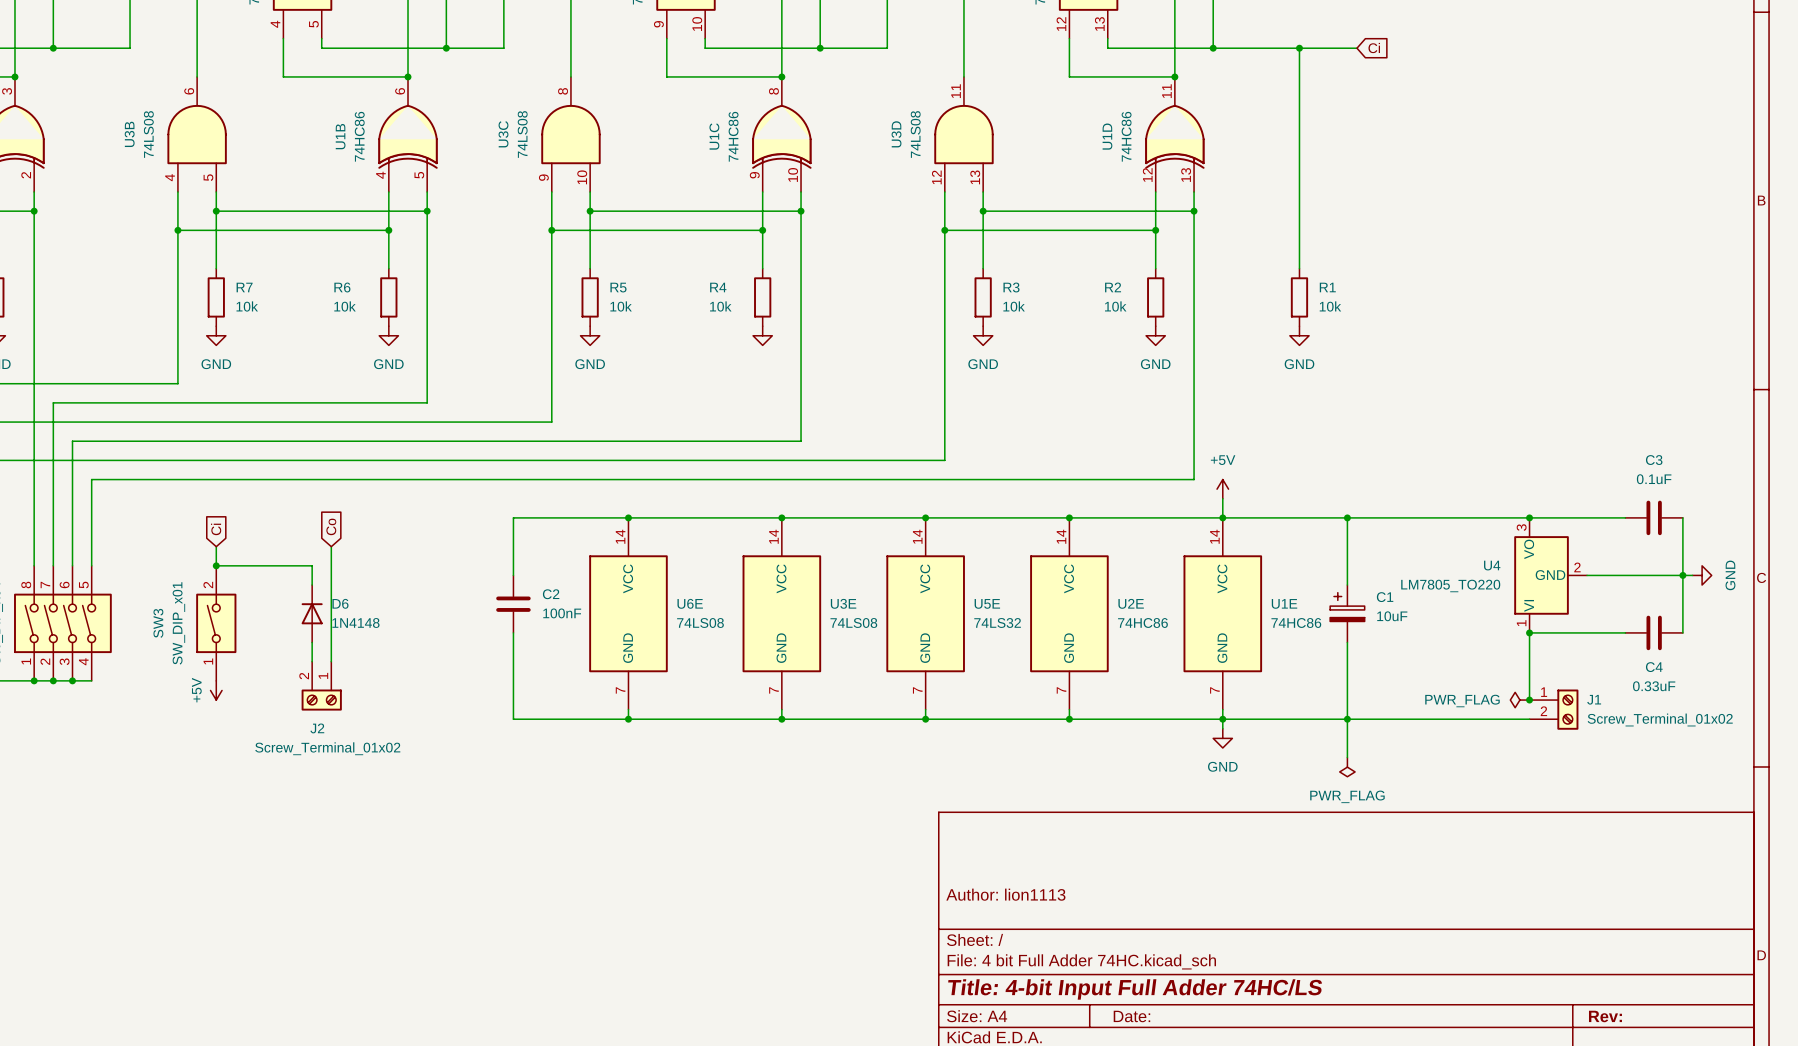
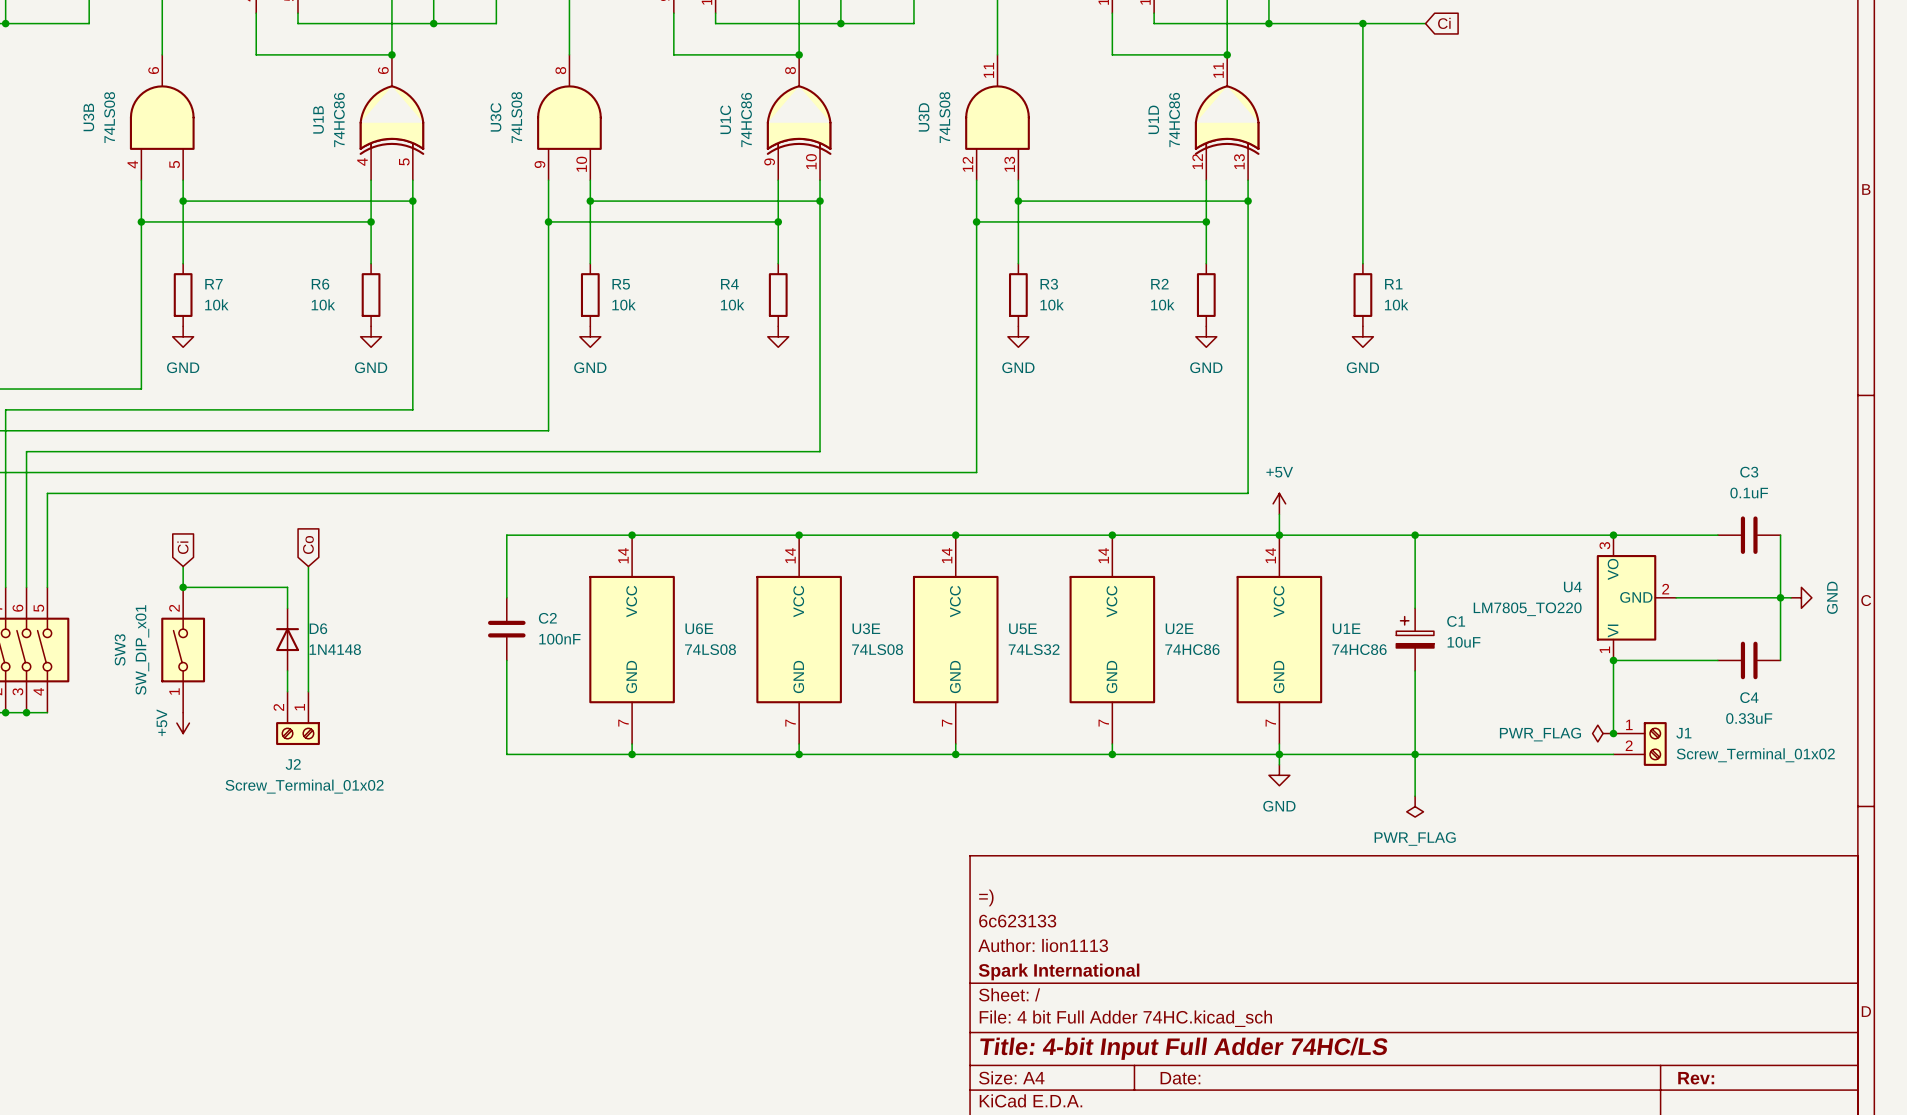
title block: none -> =) (986, 897)
title block: none -> 6c623133 (1017, 921)
title block: none -> Spark International (1059, 971)

